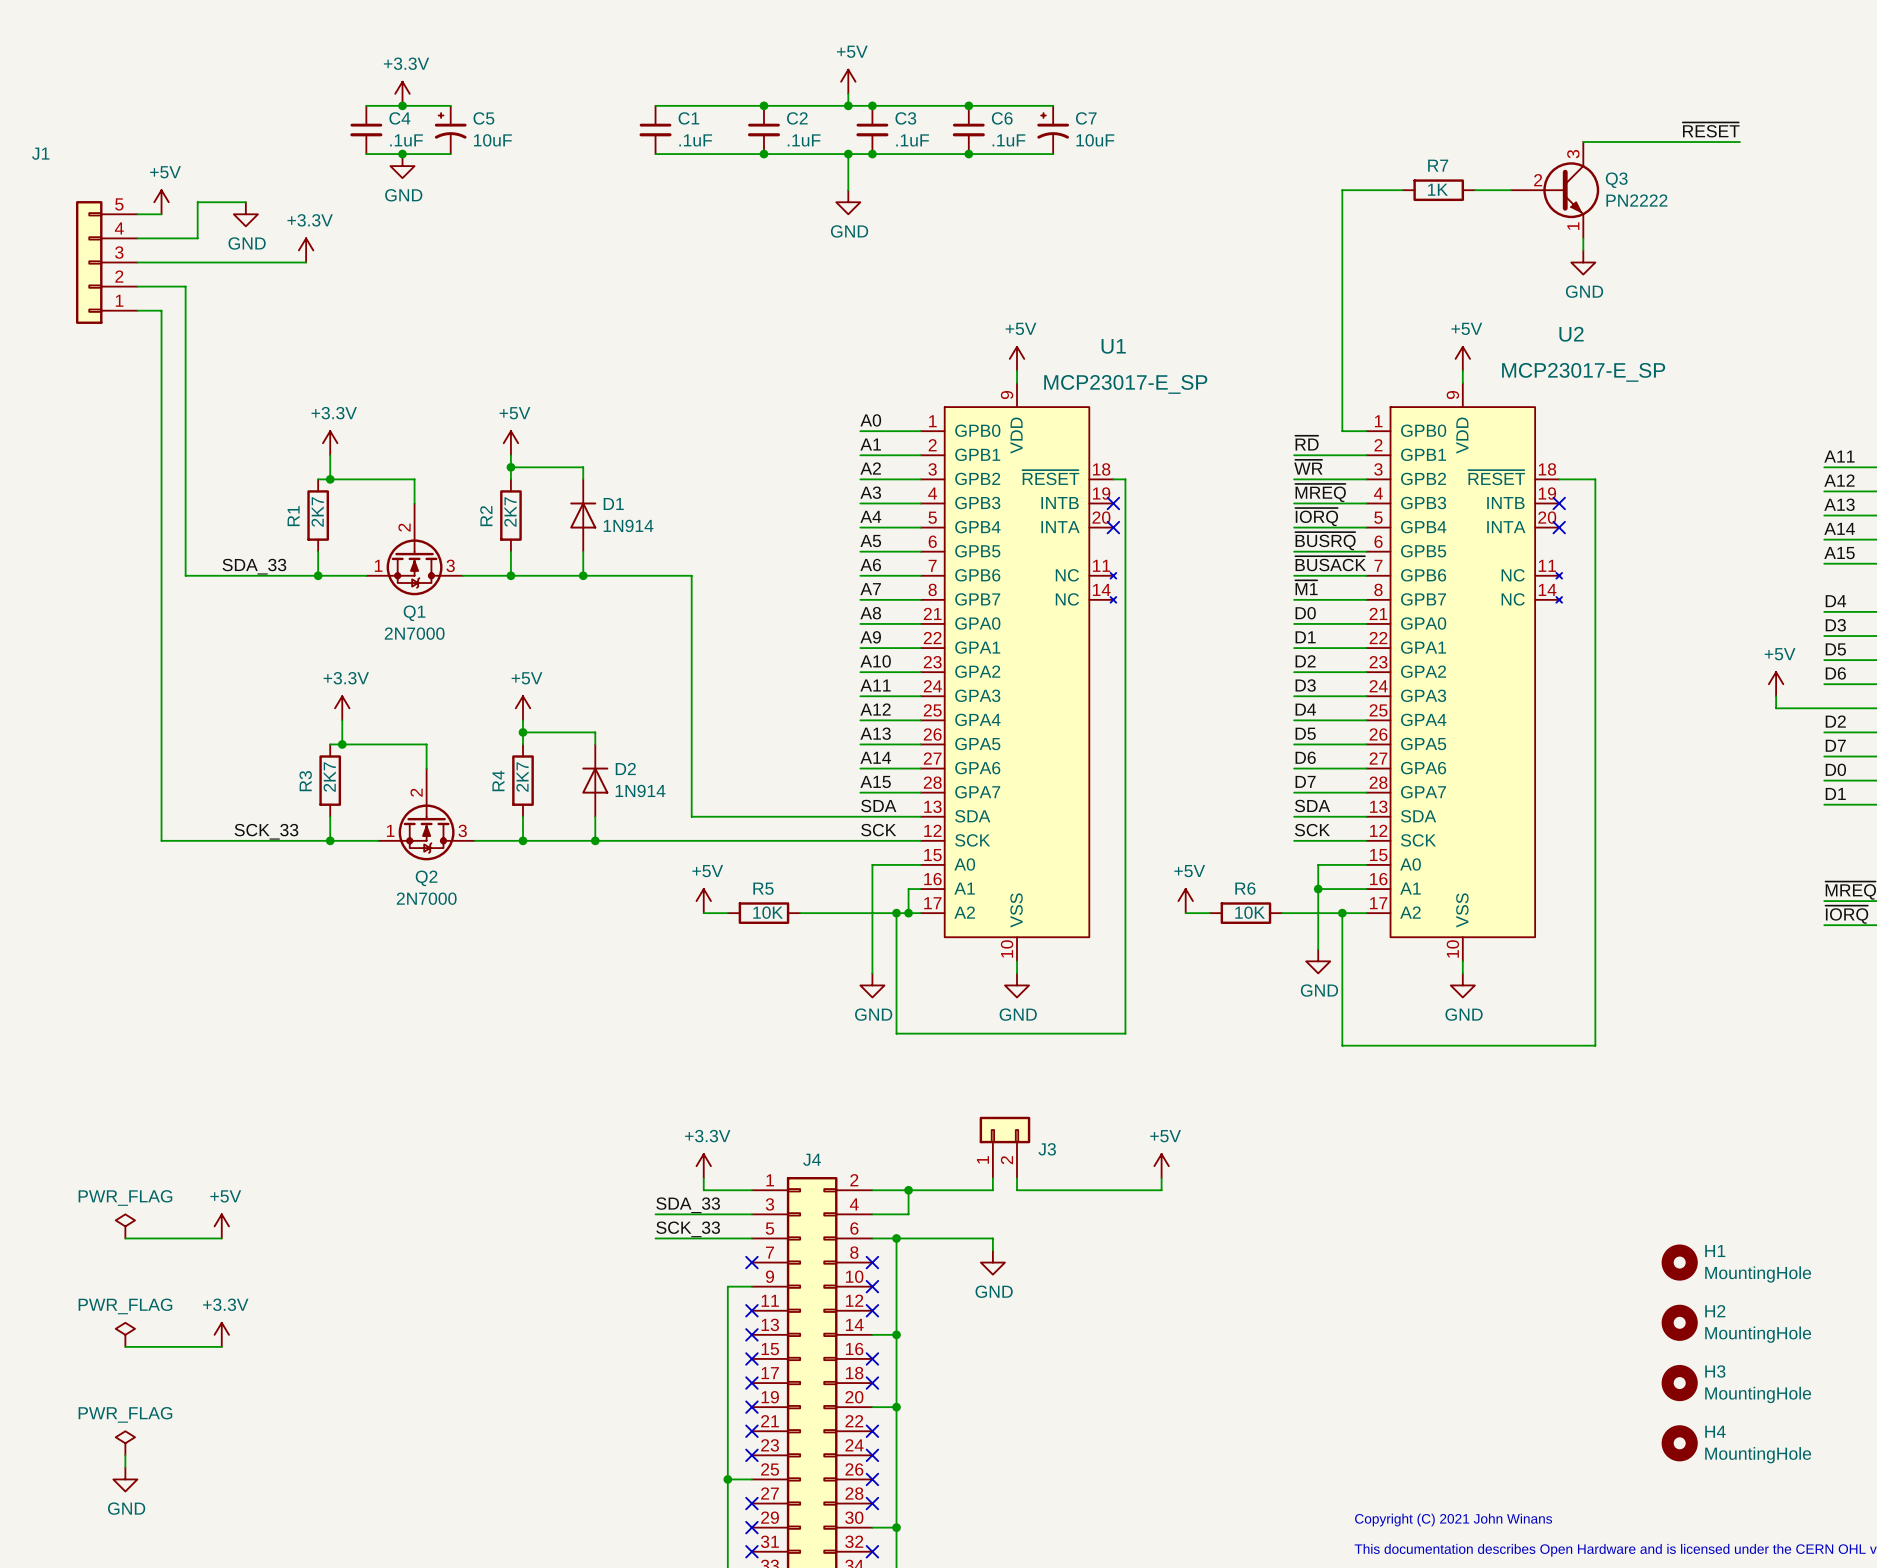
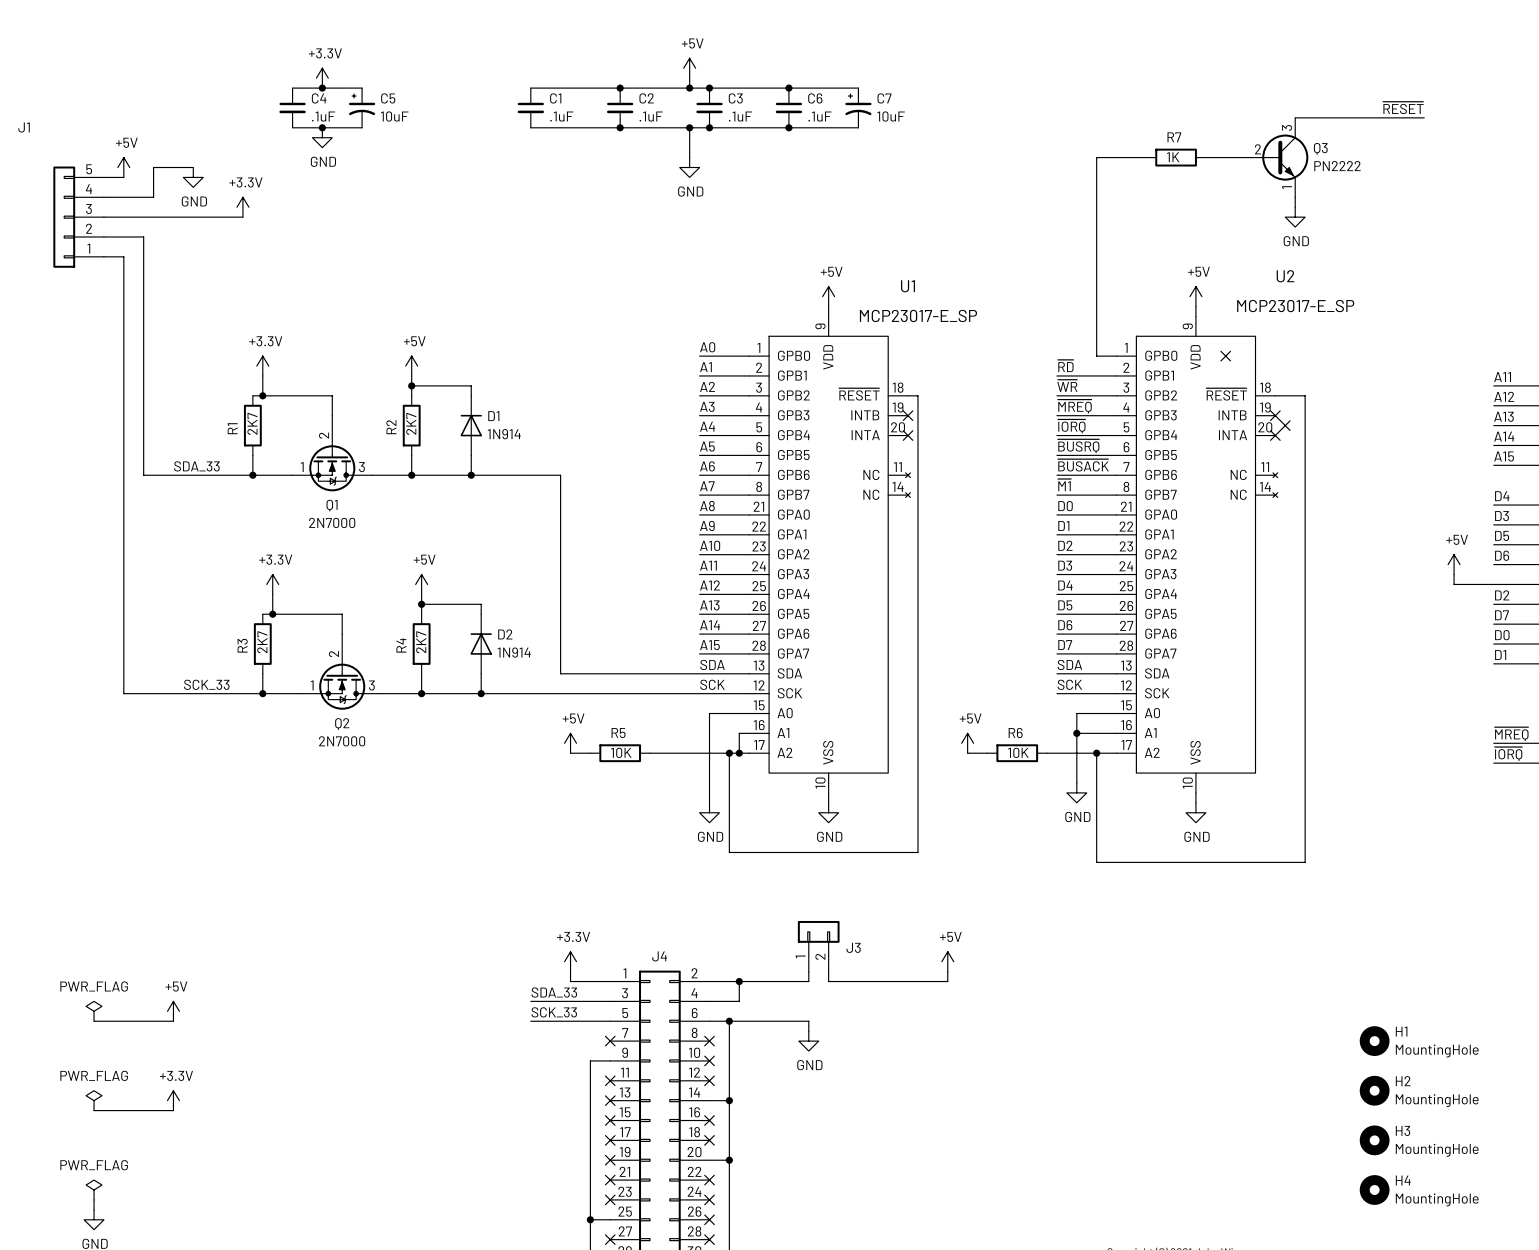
no-connect mark: none -> (1225, 356)
no-connect mark: none -> (1285, 425)

